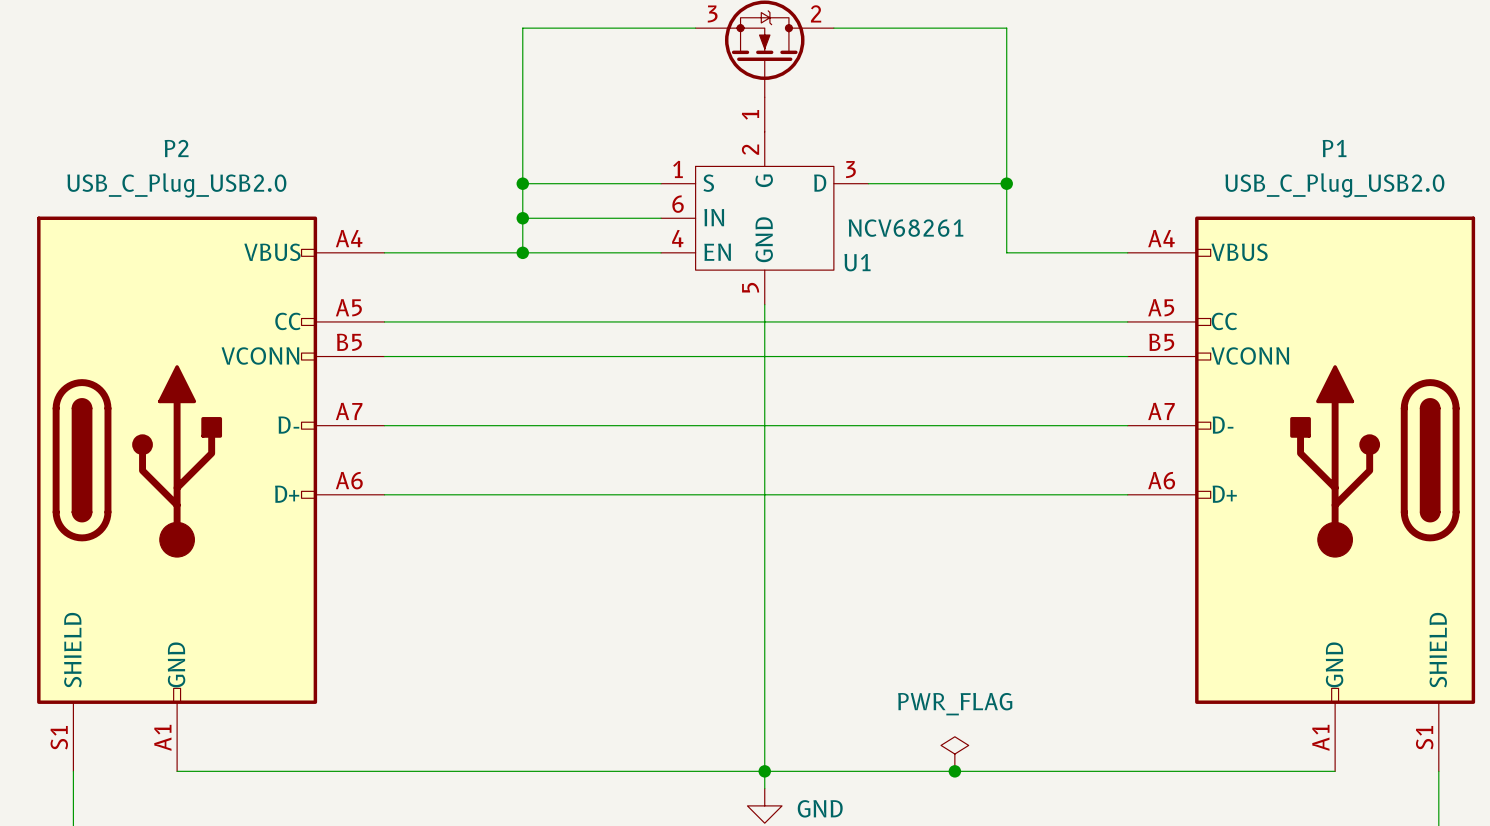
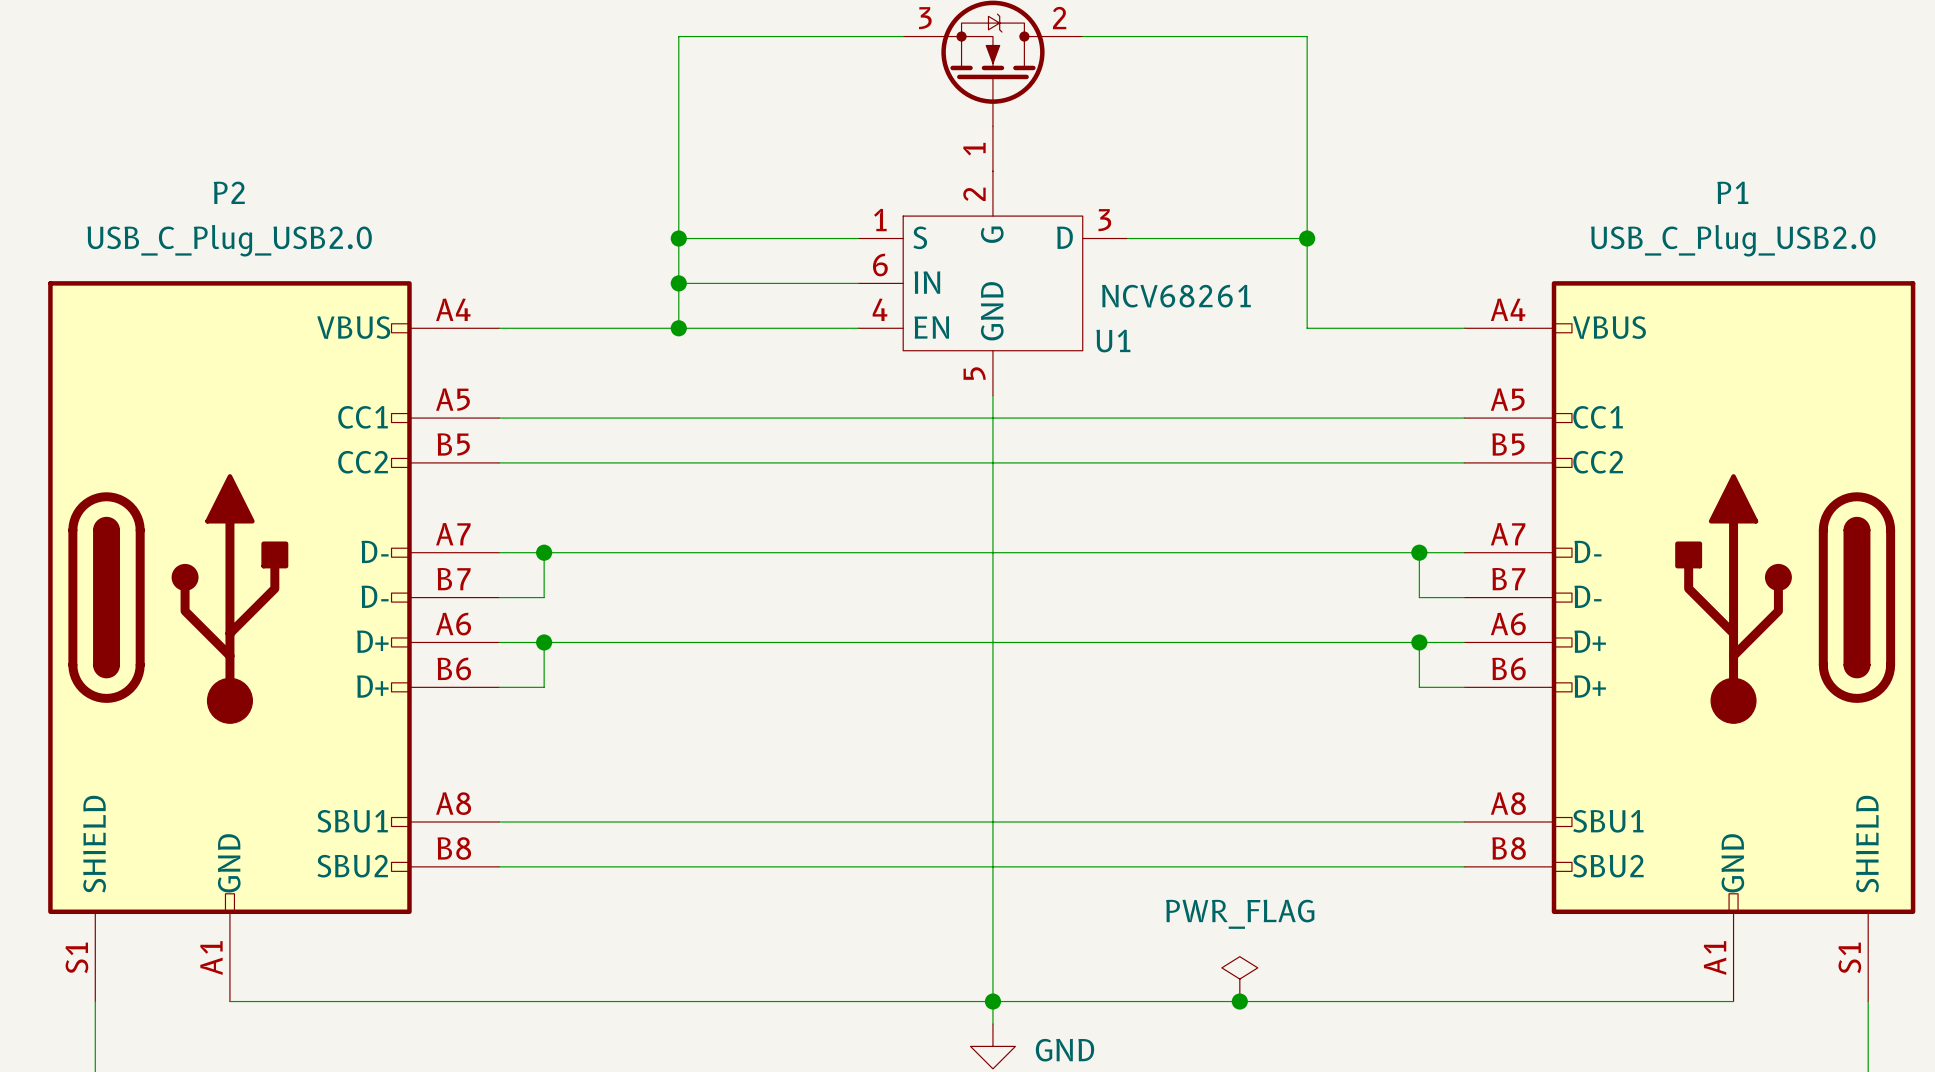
P2 symbol: [37, 216, 385, 772] -> [48, 281, 500, 1002]
P1 symbol: [1127, 216, 1476, 772] -> [1464, 281, 1916, 1002]
wire: none -> (544, 552) (544, 597) (499, 597)
junction: none -> (544, 552)
wire: none -> (1419, 552) (1419, 597) (1464, 597)
junction: none -> (1419, 552)
wire: none -> (544, 642) (544, 687) (499, 687)
junction: none -> (544, 642)
wire: none -> (1419, 642) (1419, 687) (1464, 687)
junction: none -> (1419, 642)
wire: none -> (499, 822) (1464, 822)
wire: none -> (499, 866) (1464, 866)

